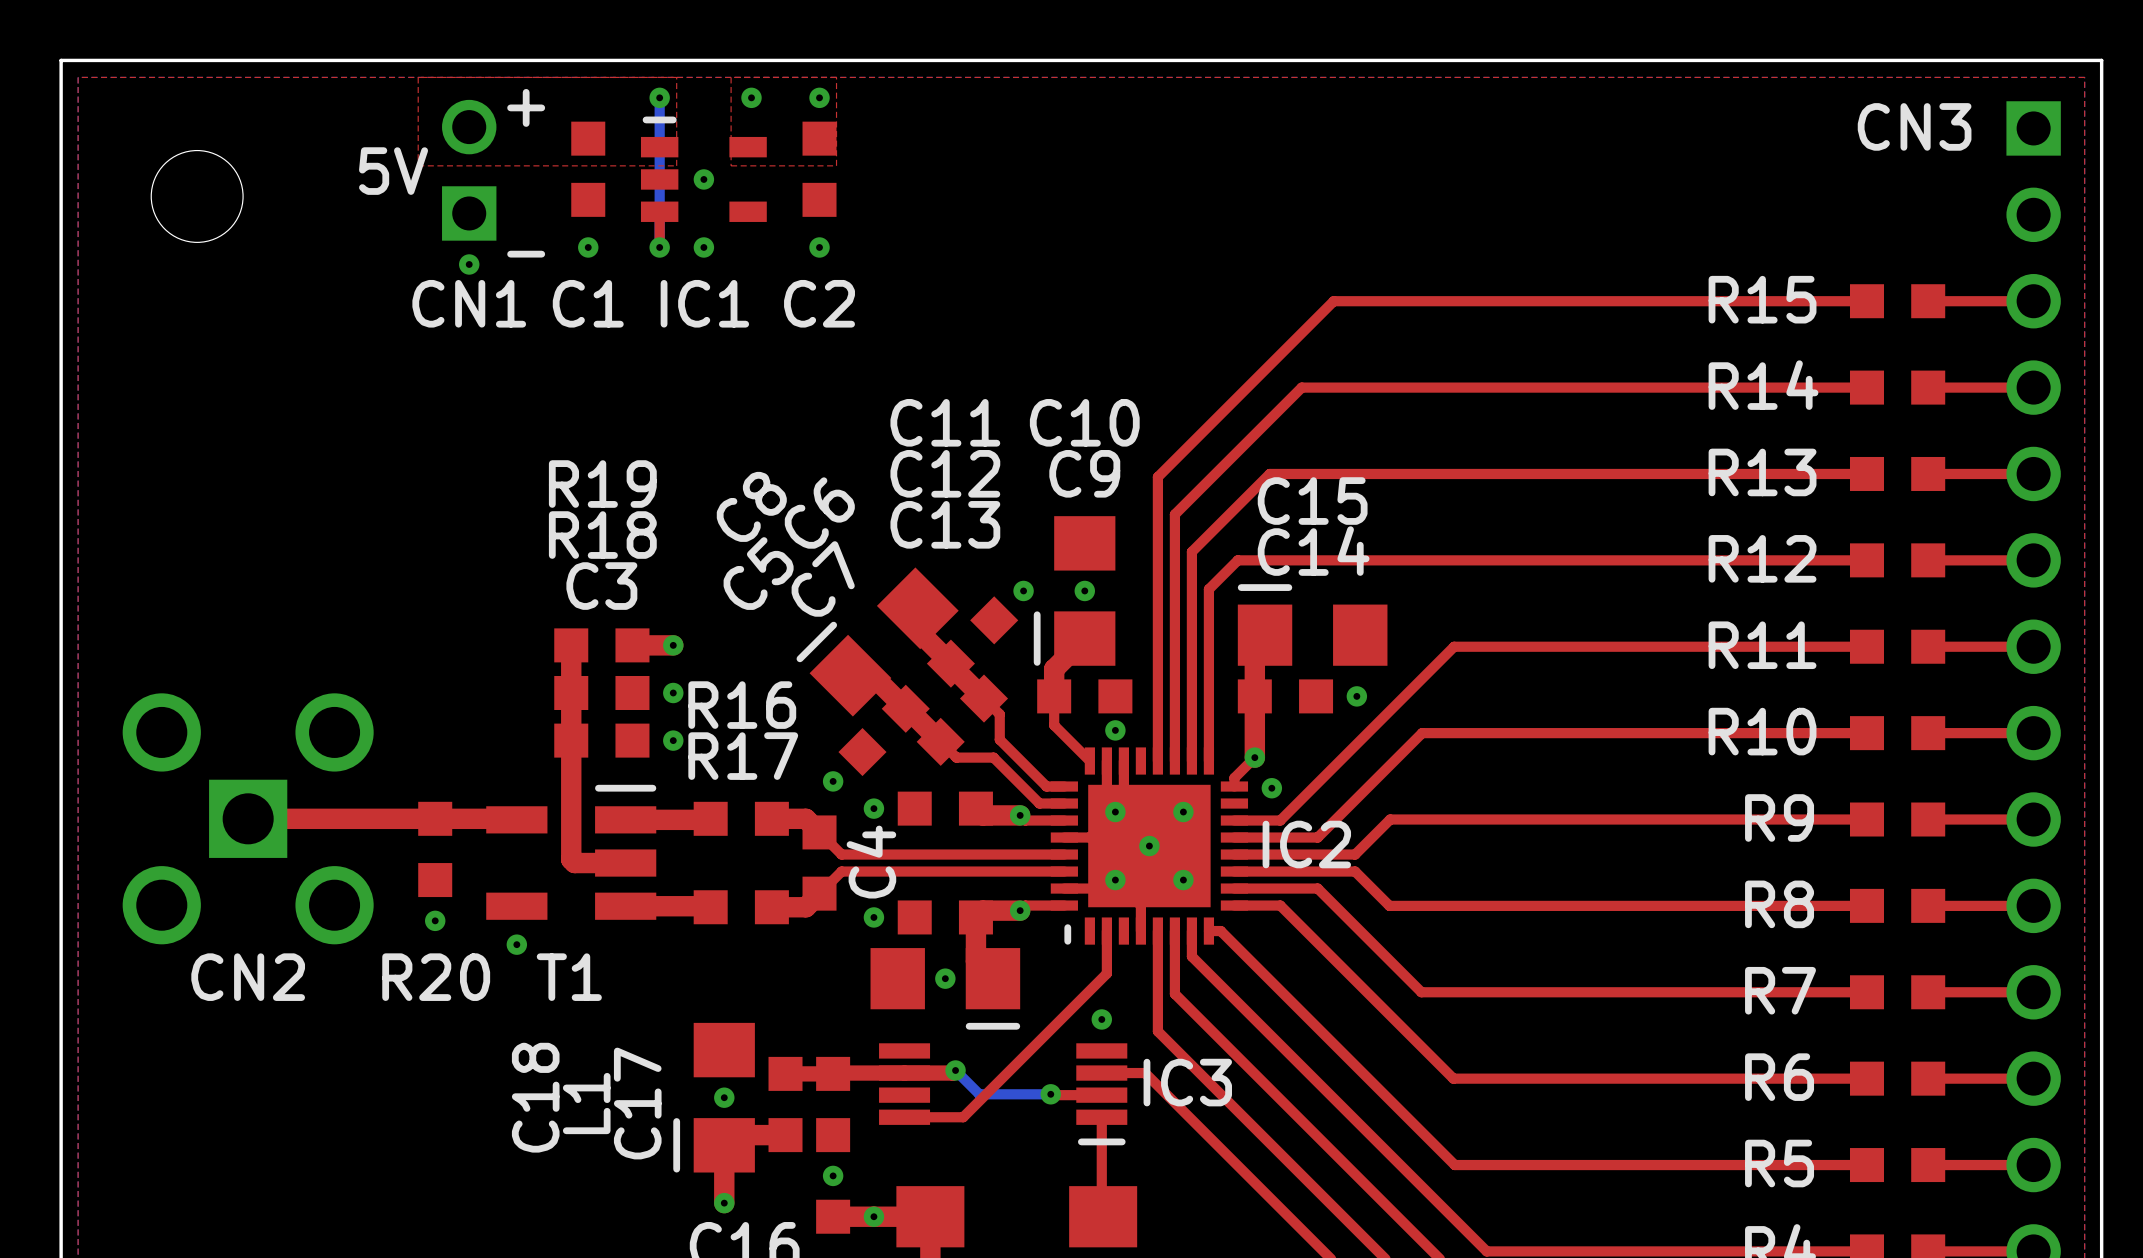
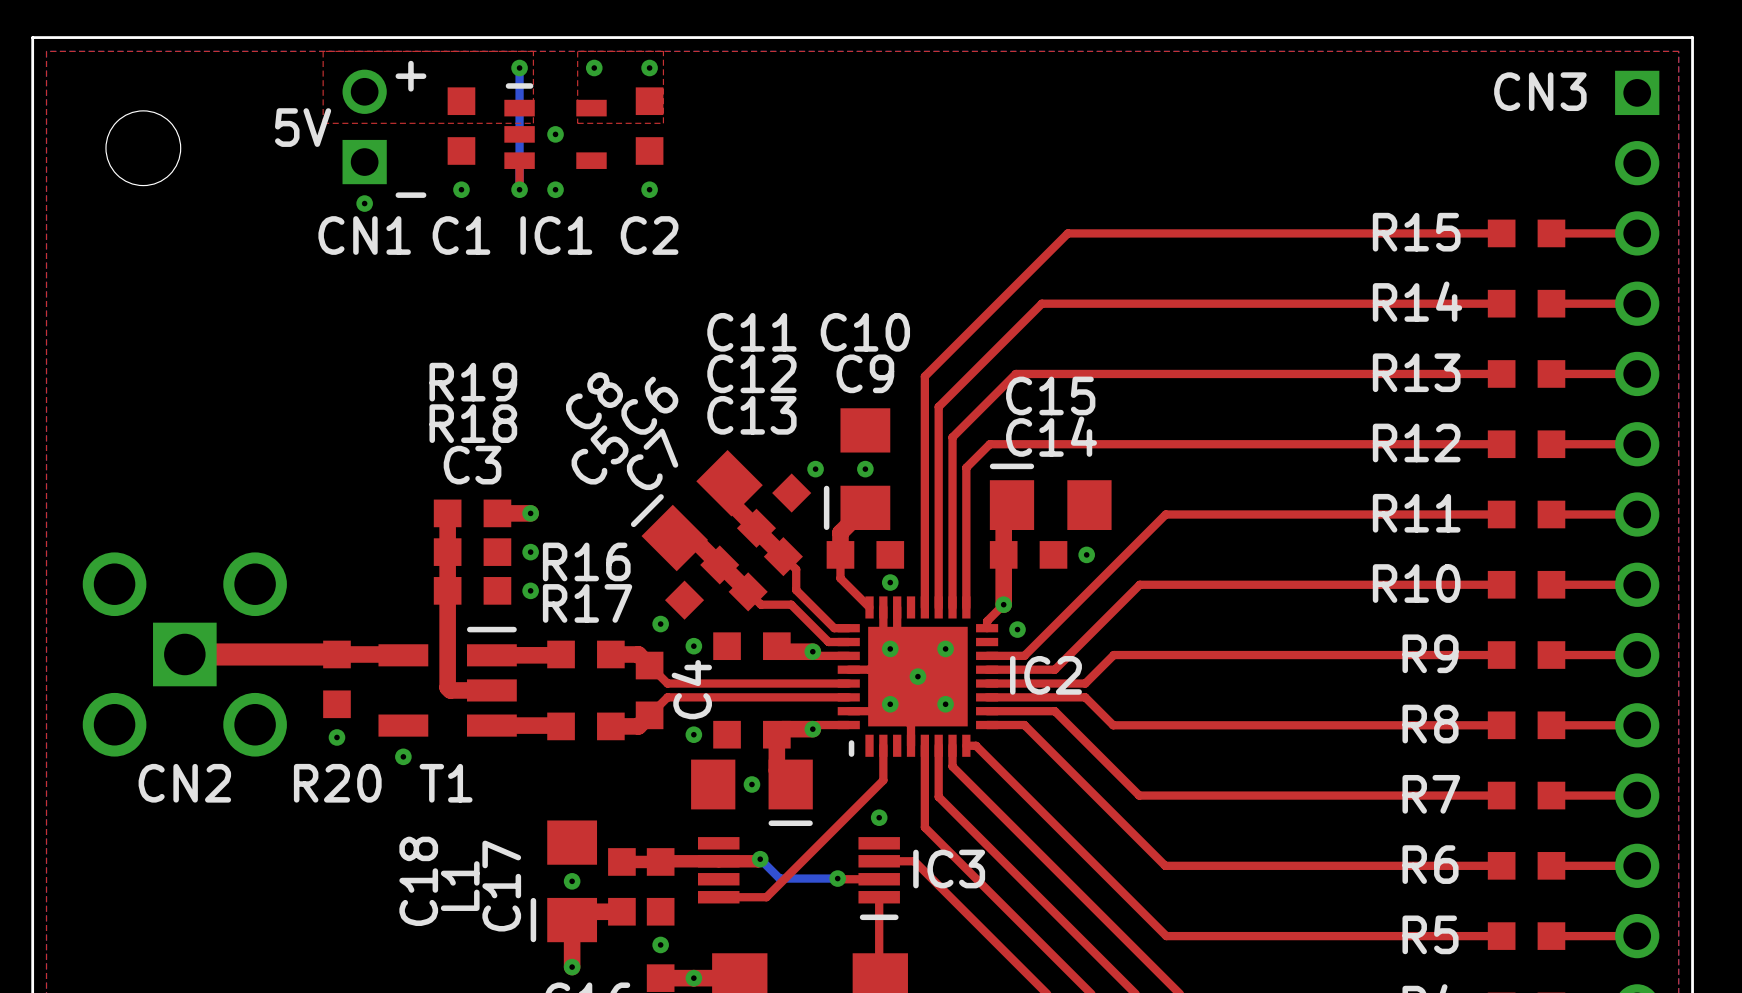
top track width: thin (248, 818) (435, 818) -> thick (184, 654) (336, 654)

